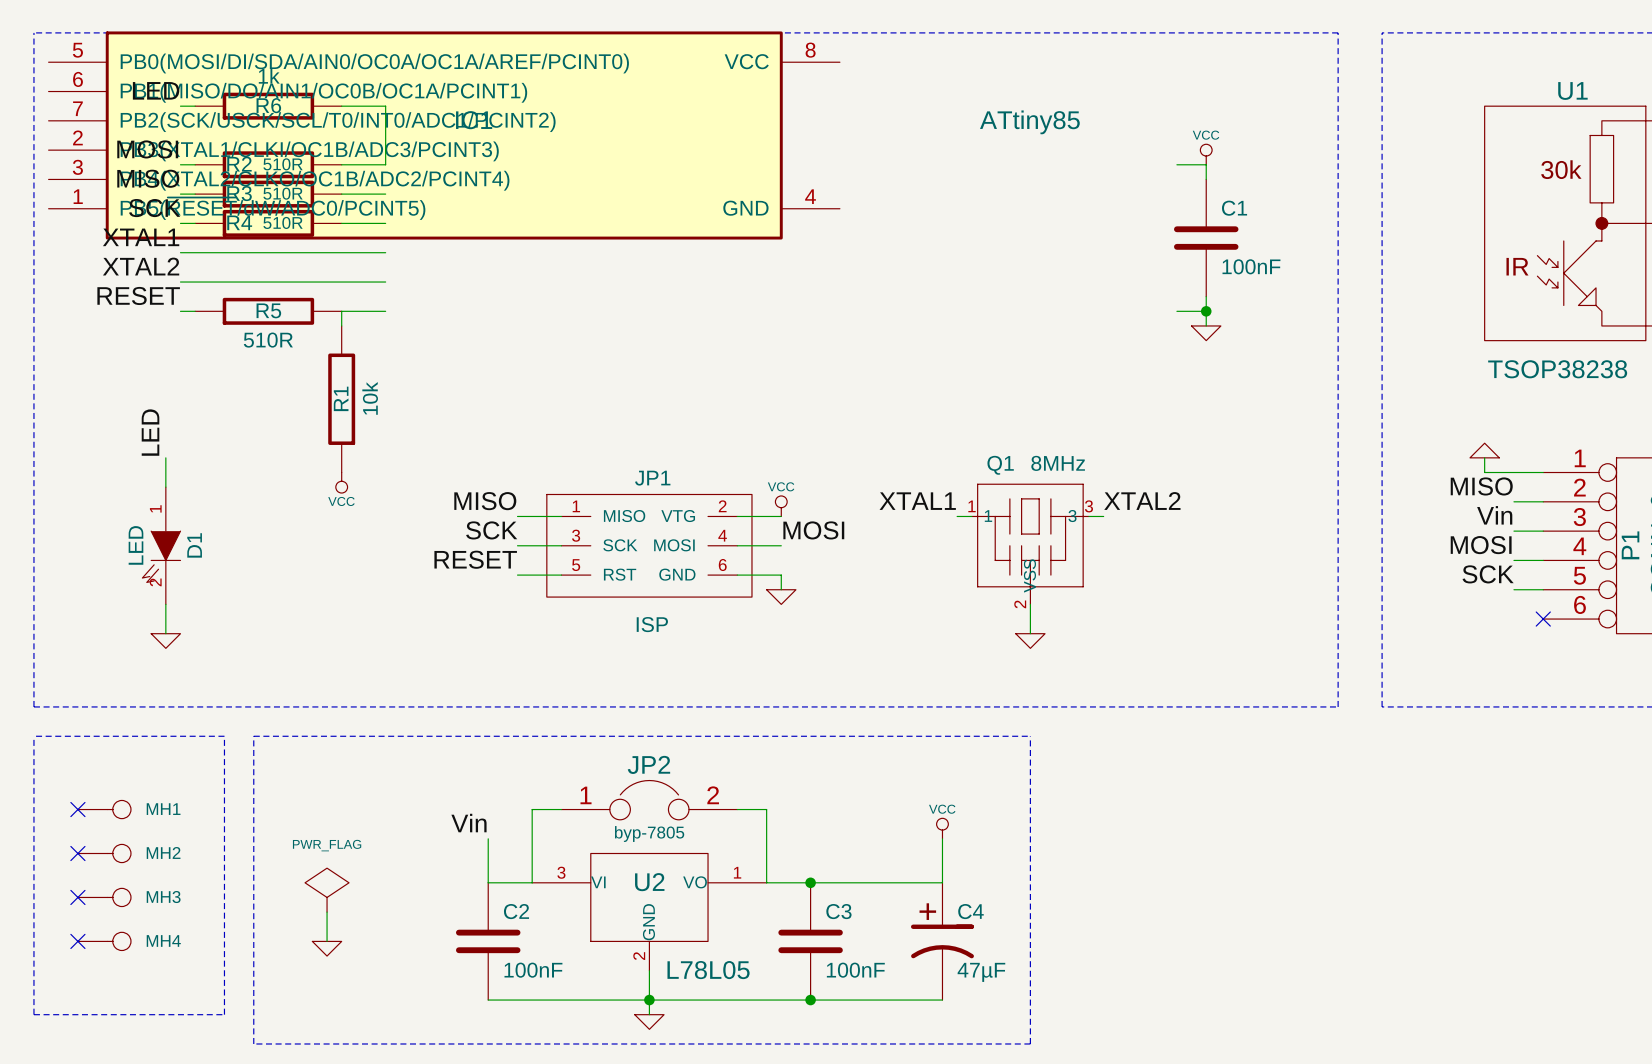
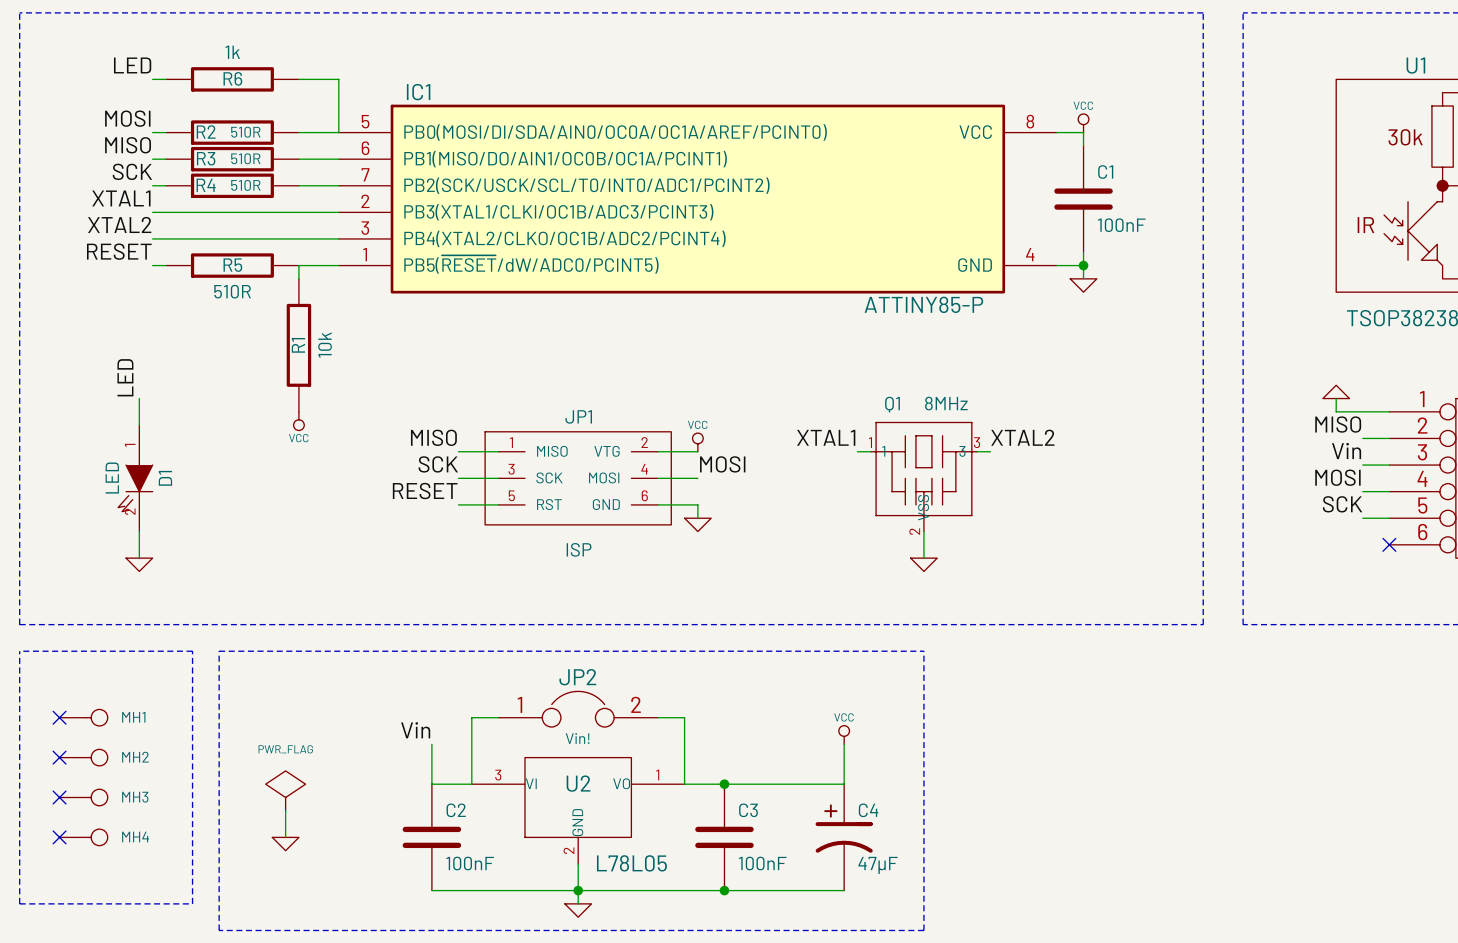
IC1 value: ATtiny85 (1029, 122) -> ATTINY85-P (923, 304)
IC1 position: (444, 135) -> (697, 199)
JP2 value: byp-7805 (649, 834) -> Vin! (577, 738)

